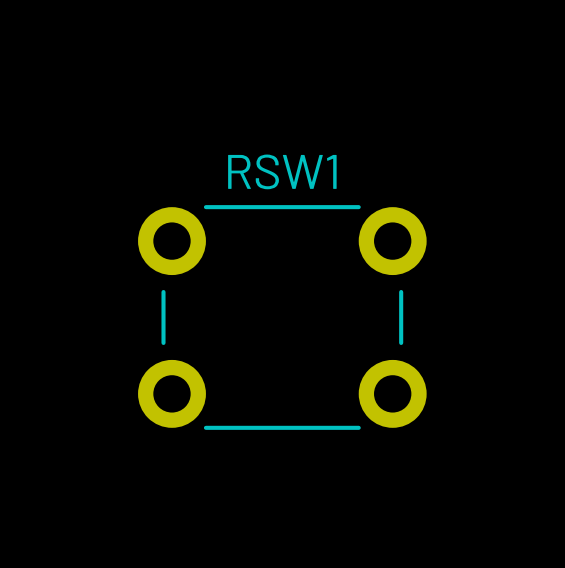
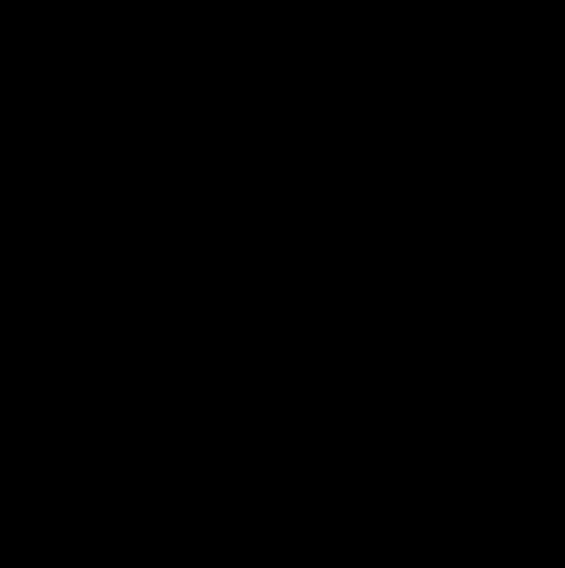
RSW1: (282, 317) -> none

